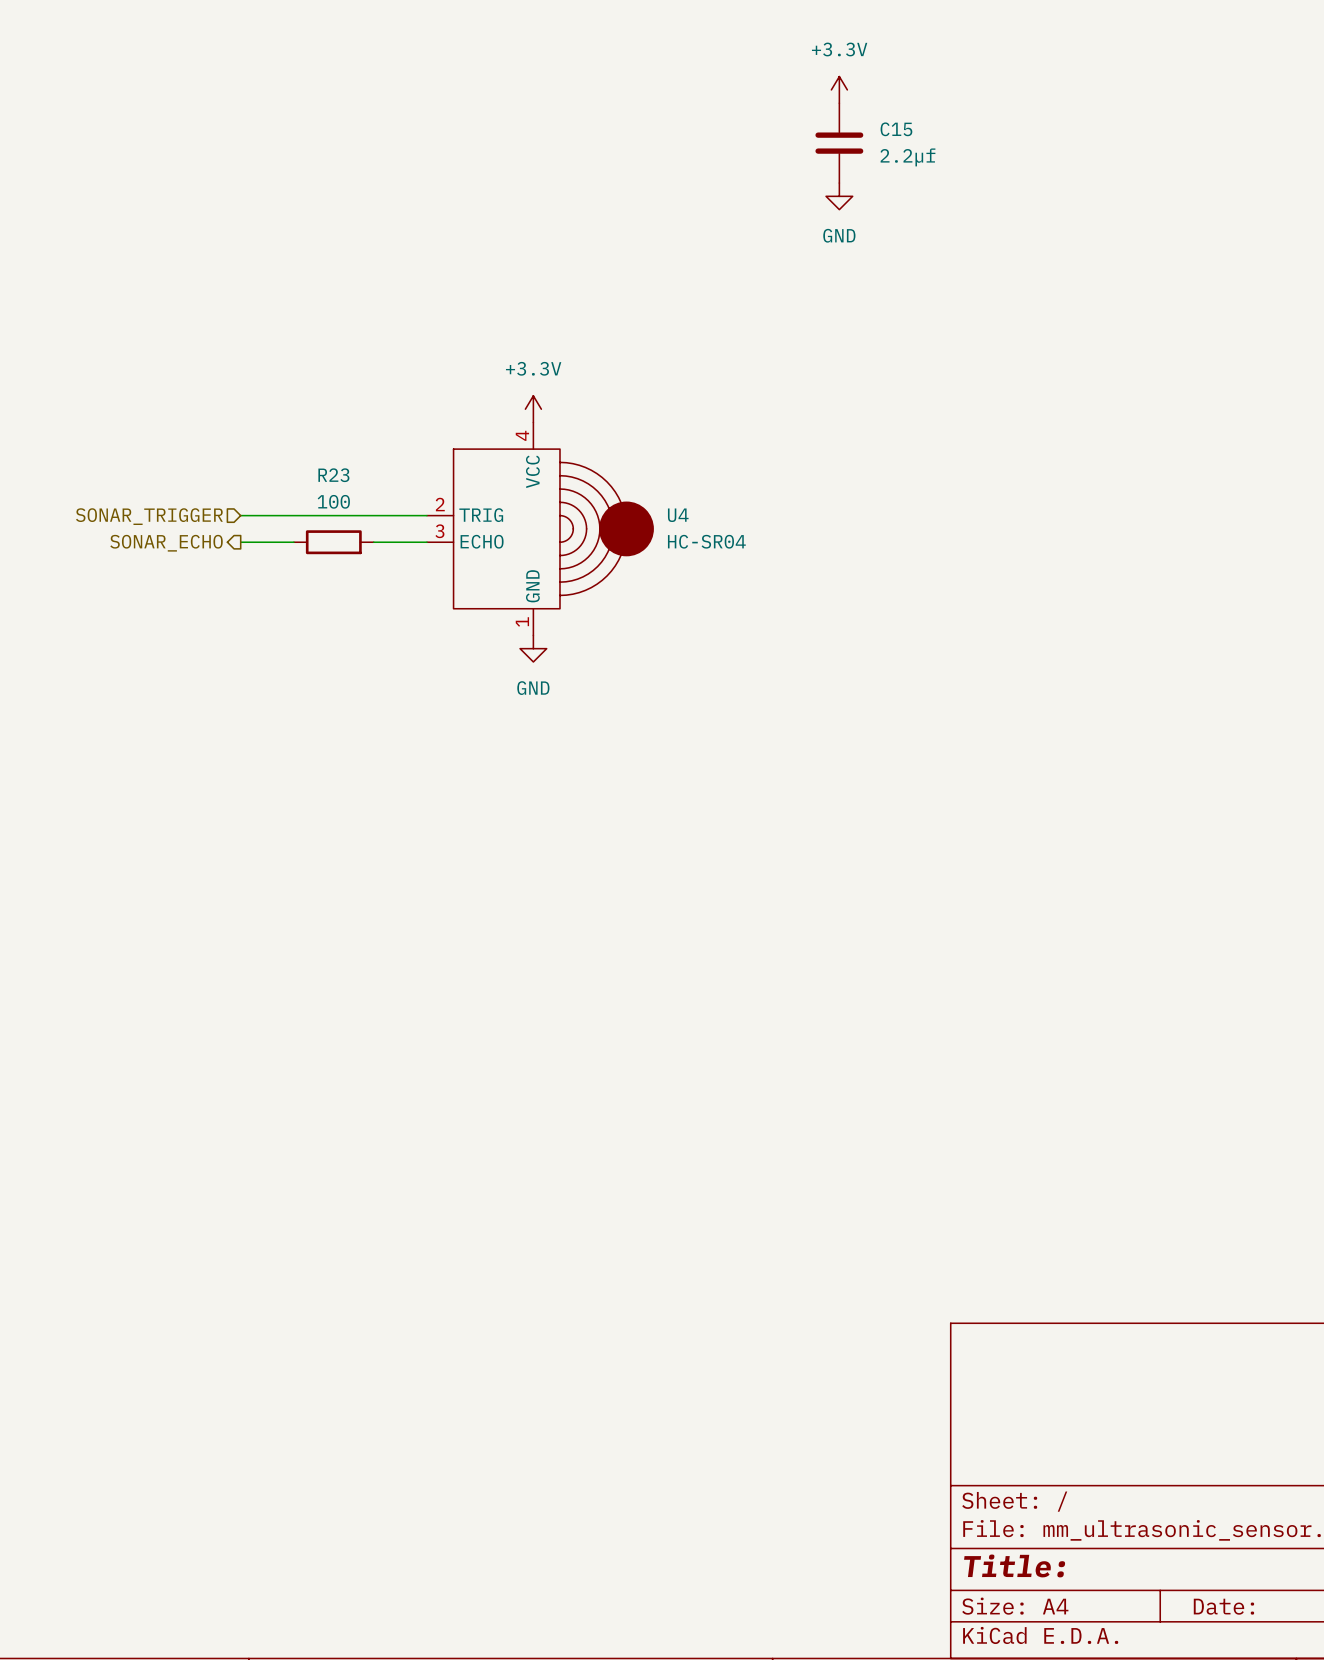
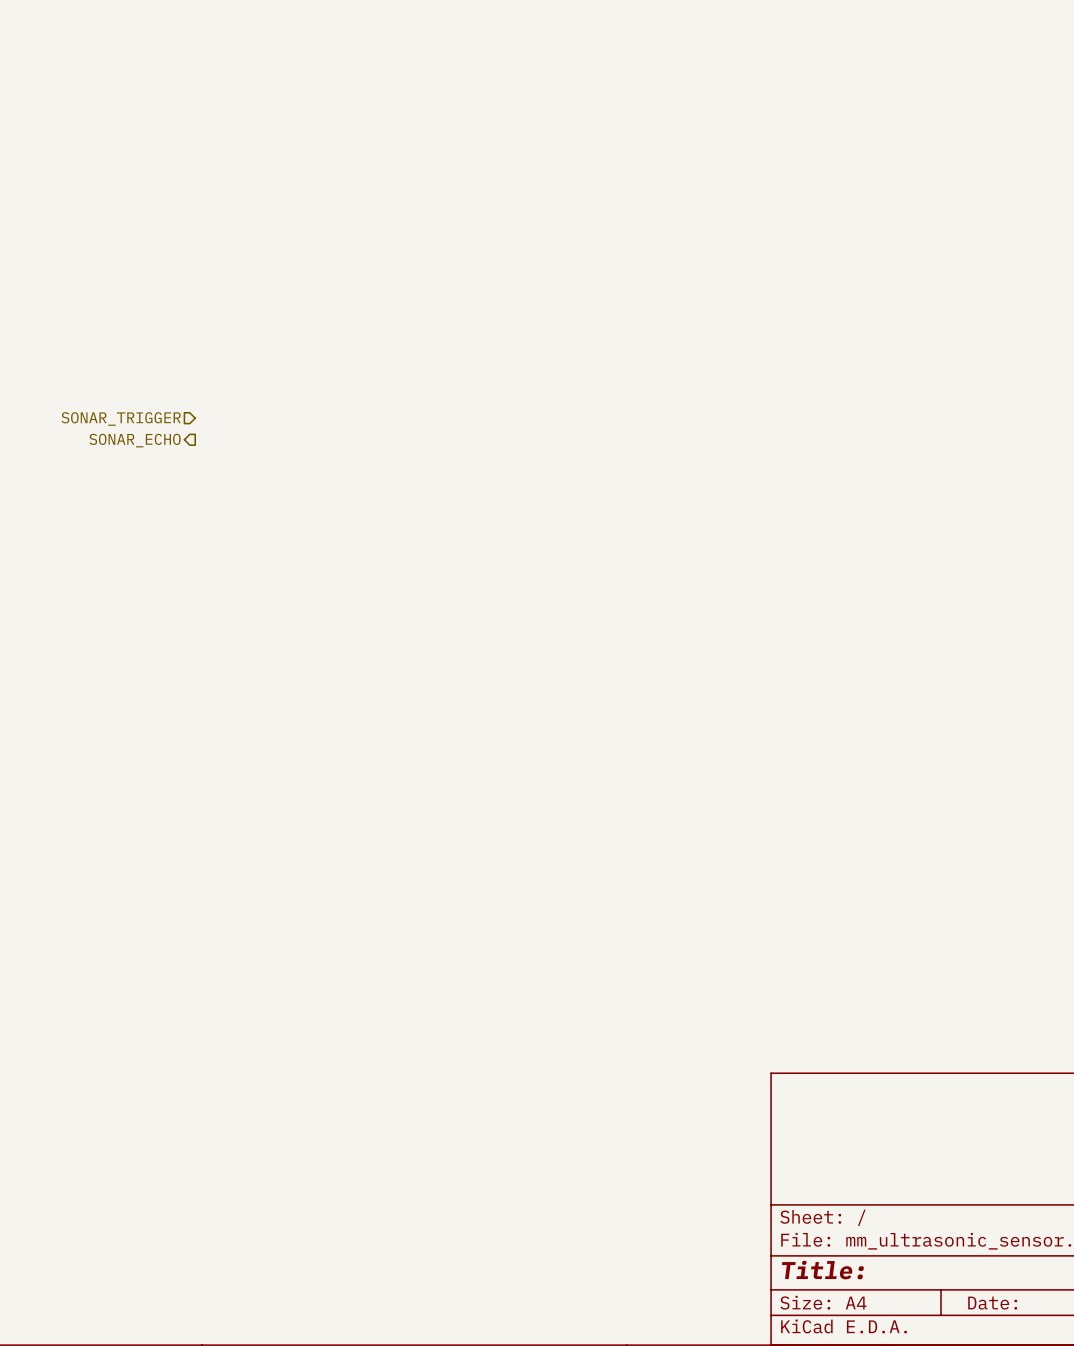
power symbol: +3.3V (839, 89) -> none
C15: 2.2µf (839, 143) -> none
power symbol: GND (839, 196) -> none
power symbol: +3.3V (533, 409) -> none
wire: (240, 515) (426, 515) -> none
U4: HC-SR04 (540, 528) -> none
wire: (240, 542) (293, 542) -> none
R23: 100 (333, 542) -> none
wire: (373, 542) (426, 542) -> none
power symbol: GND (533, 648) -> none

